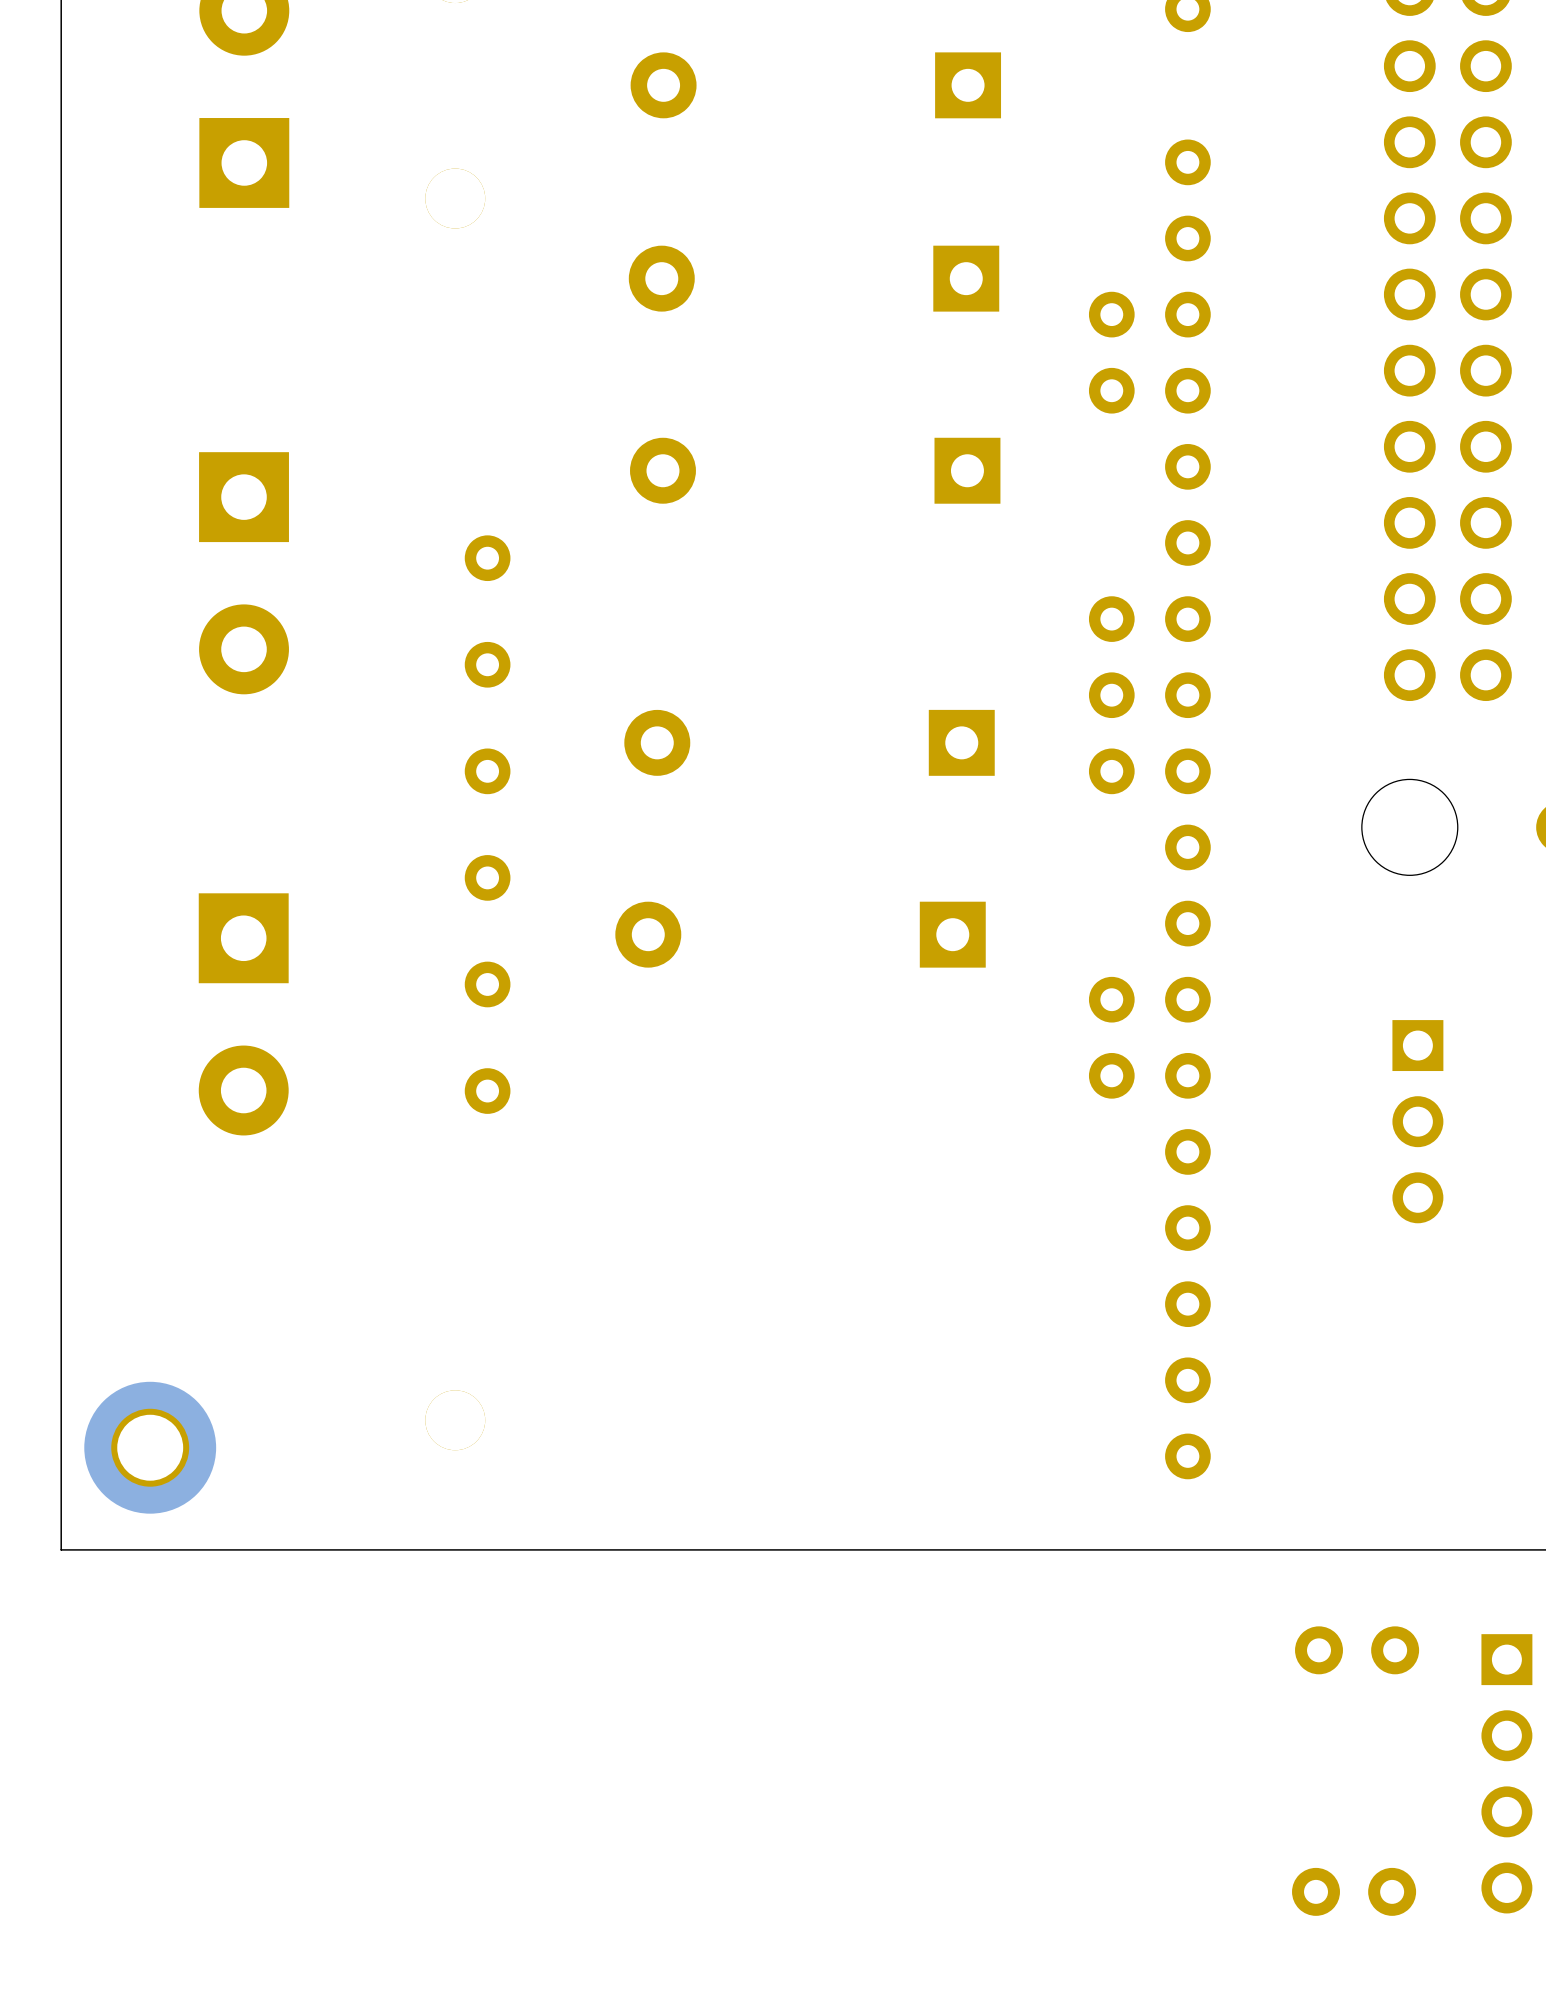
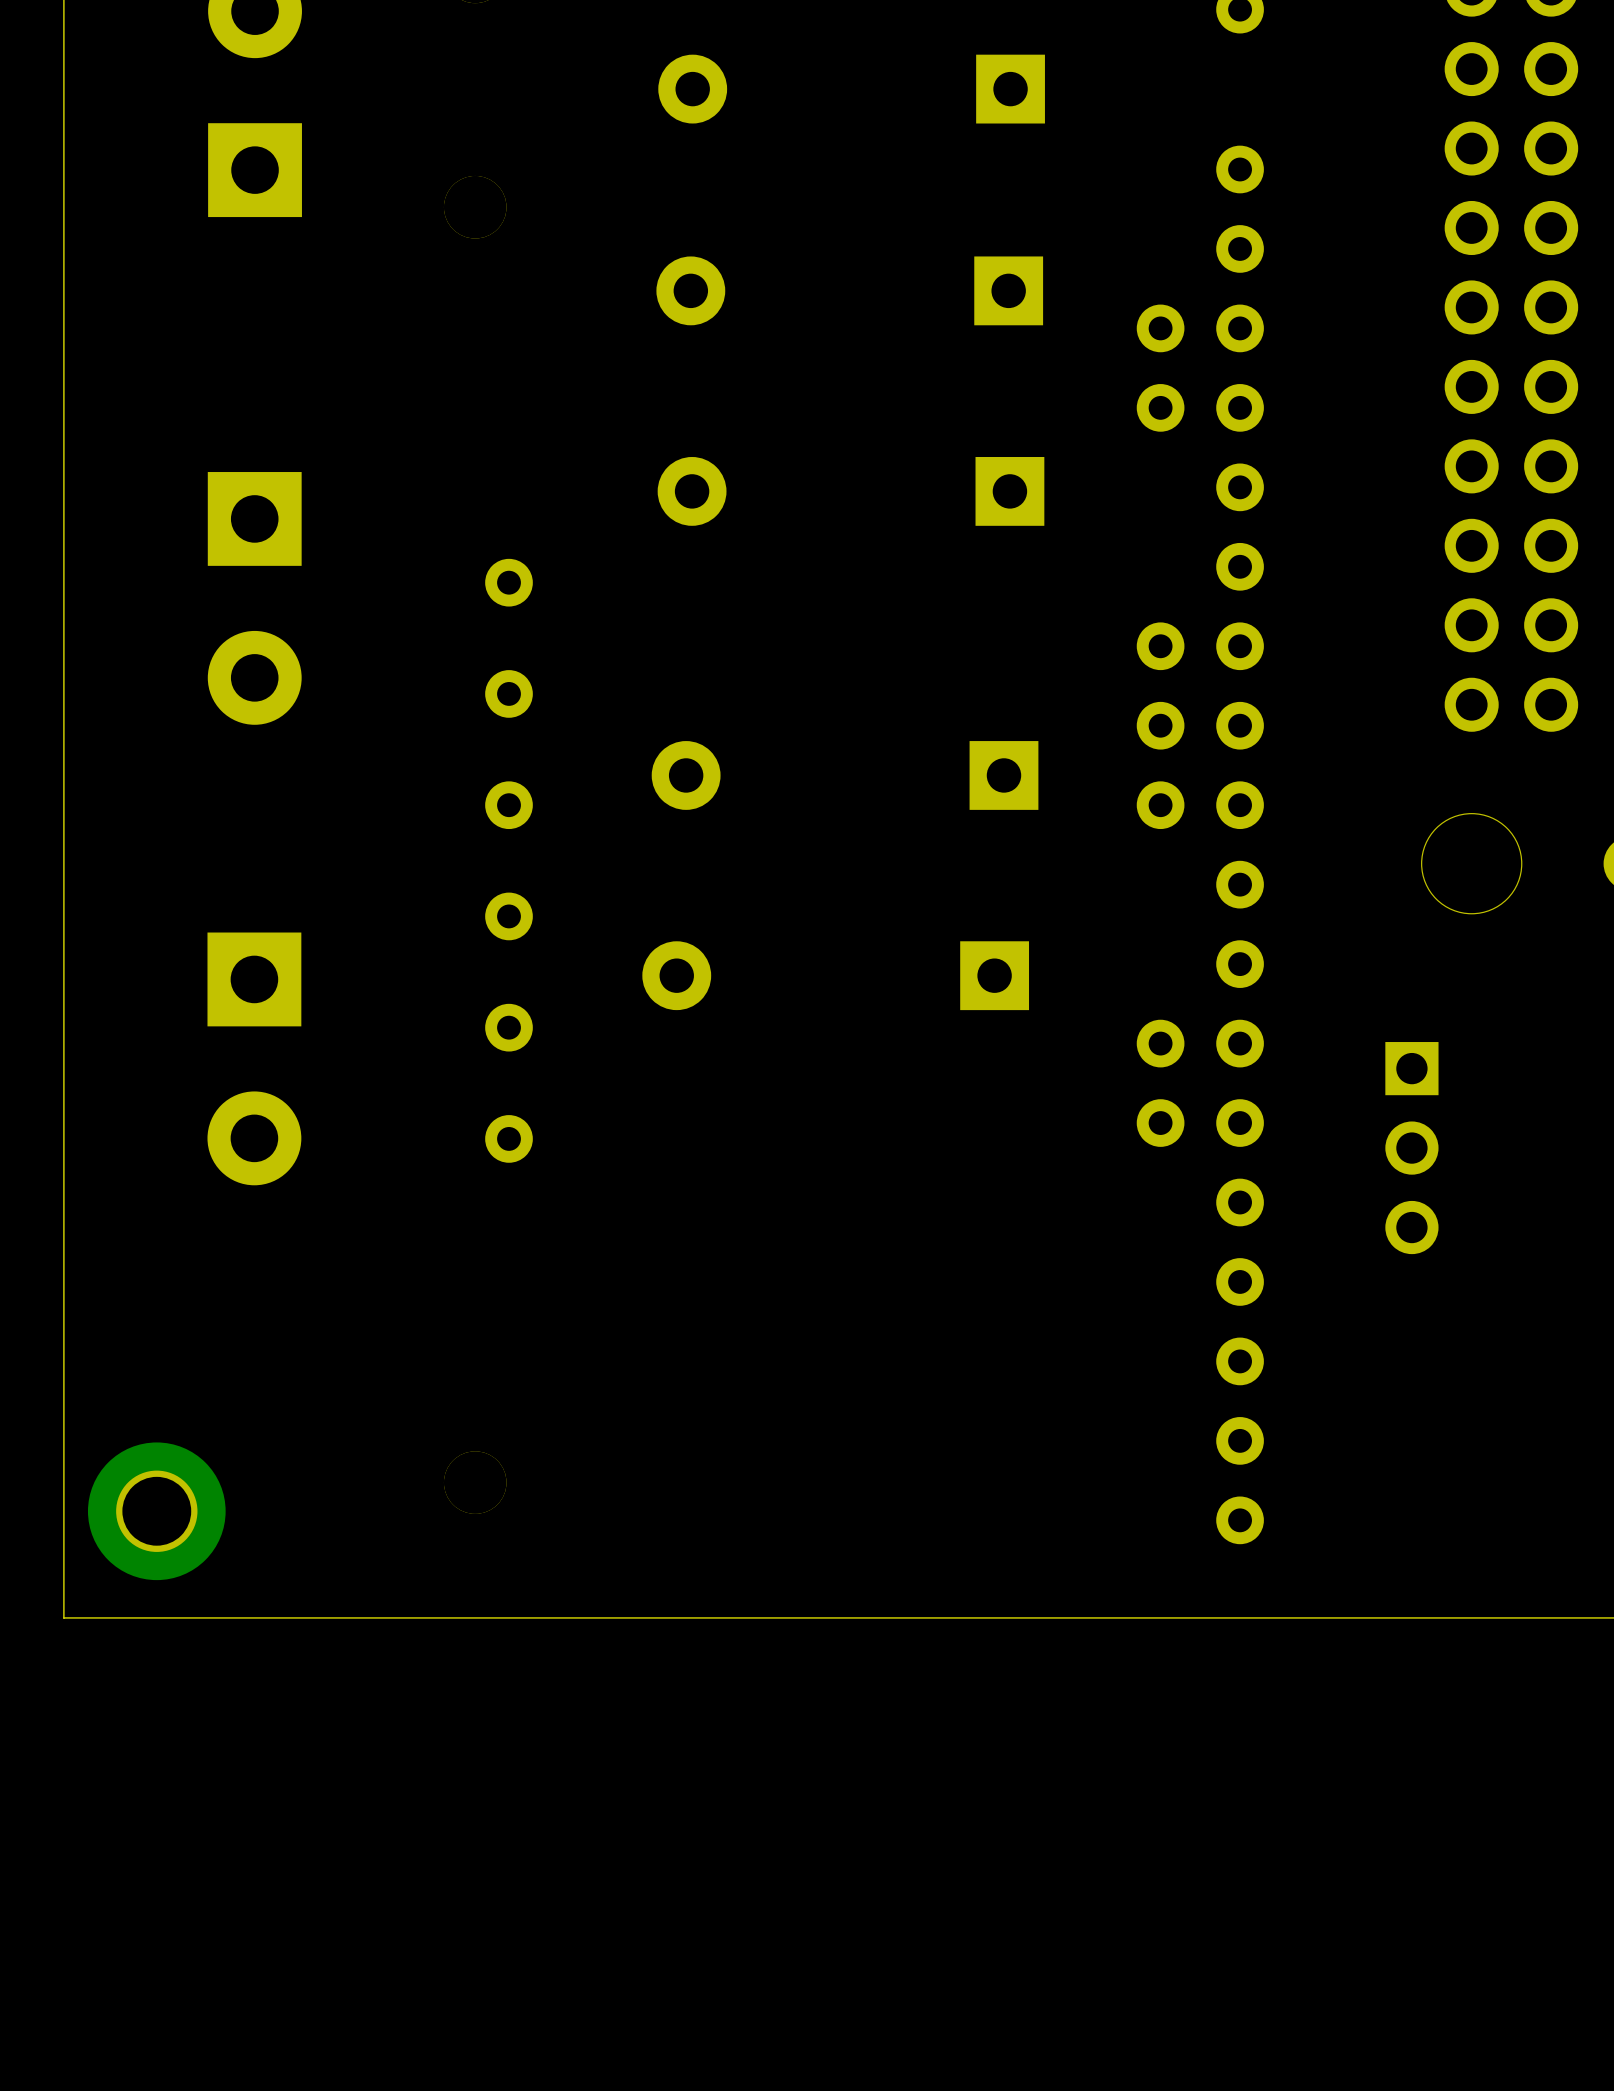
part position: (1417, 1121) -> (1411, 1148)
part: (1357, 1650) -> none
part: (1506, 1773) -> none
part: (1354, 1891) -> none

